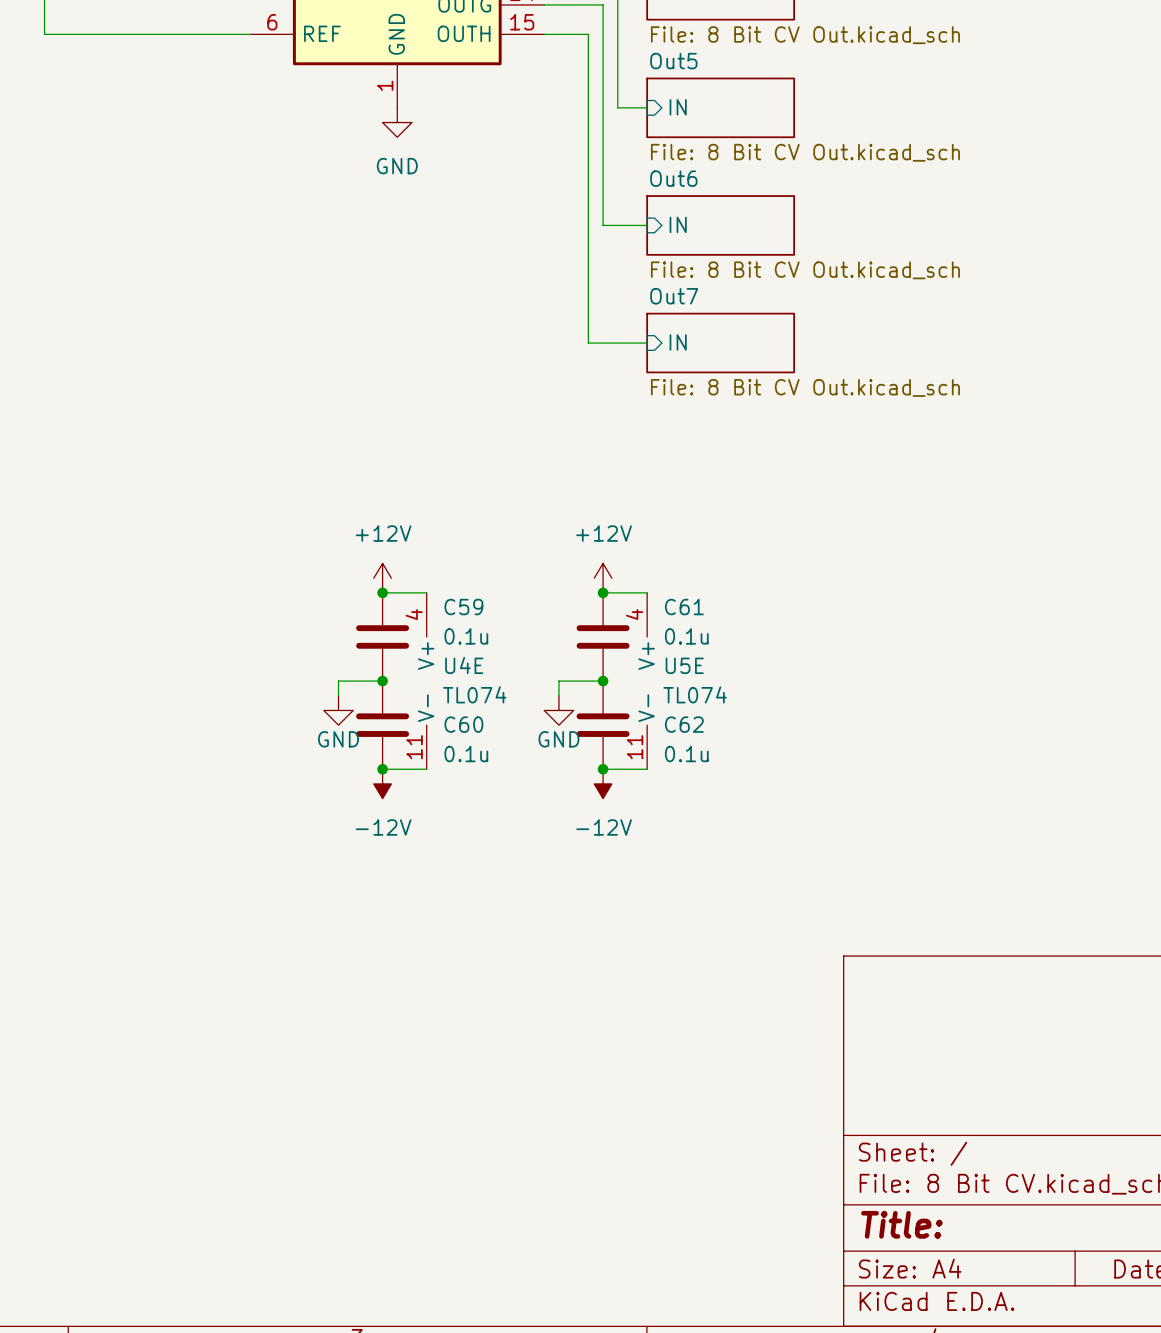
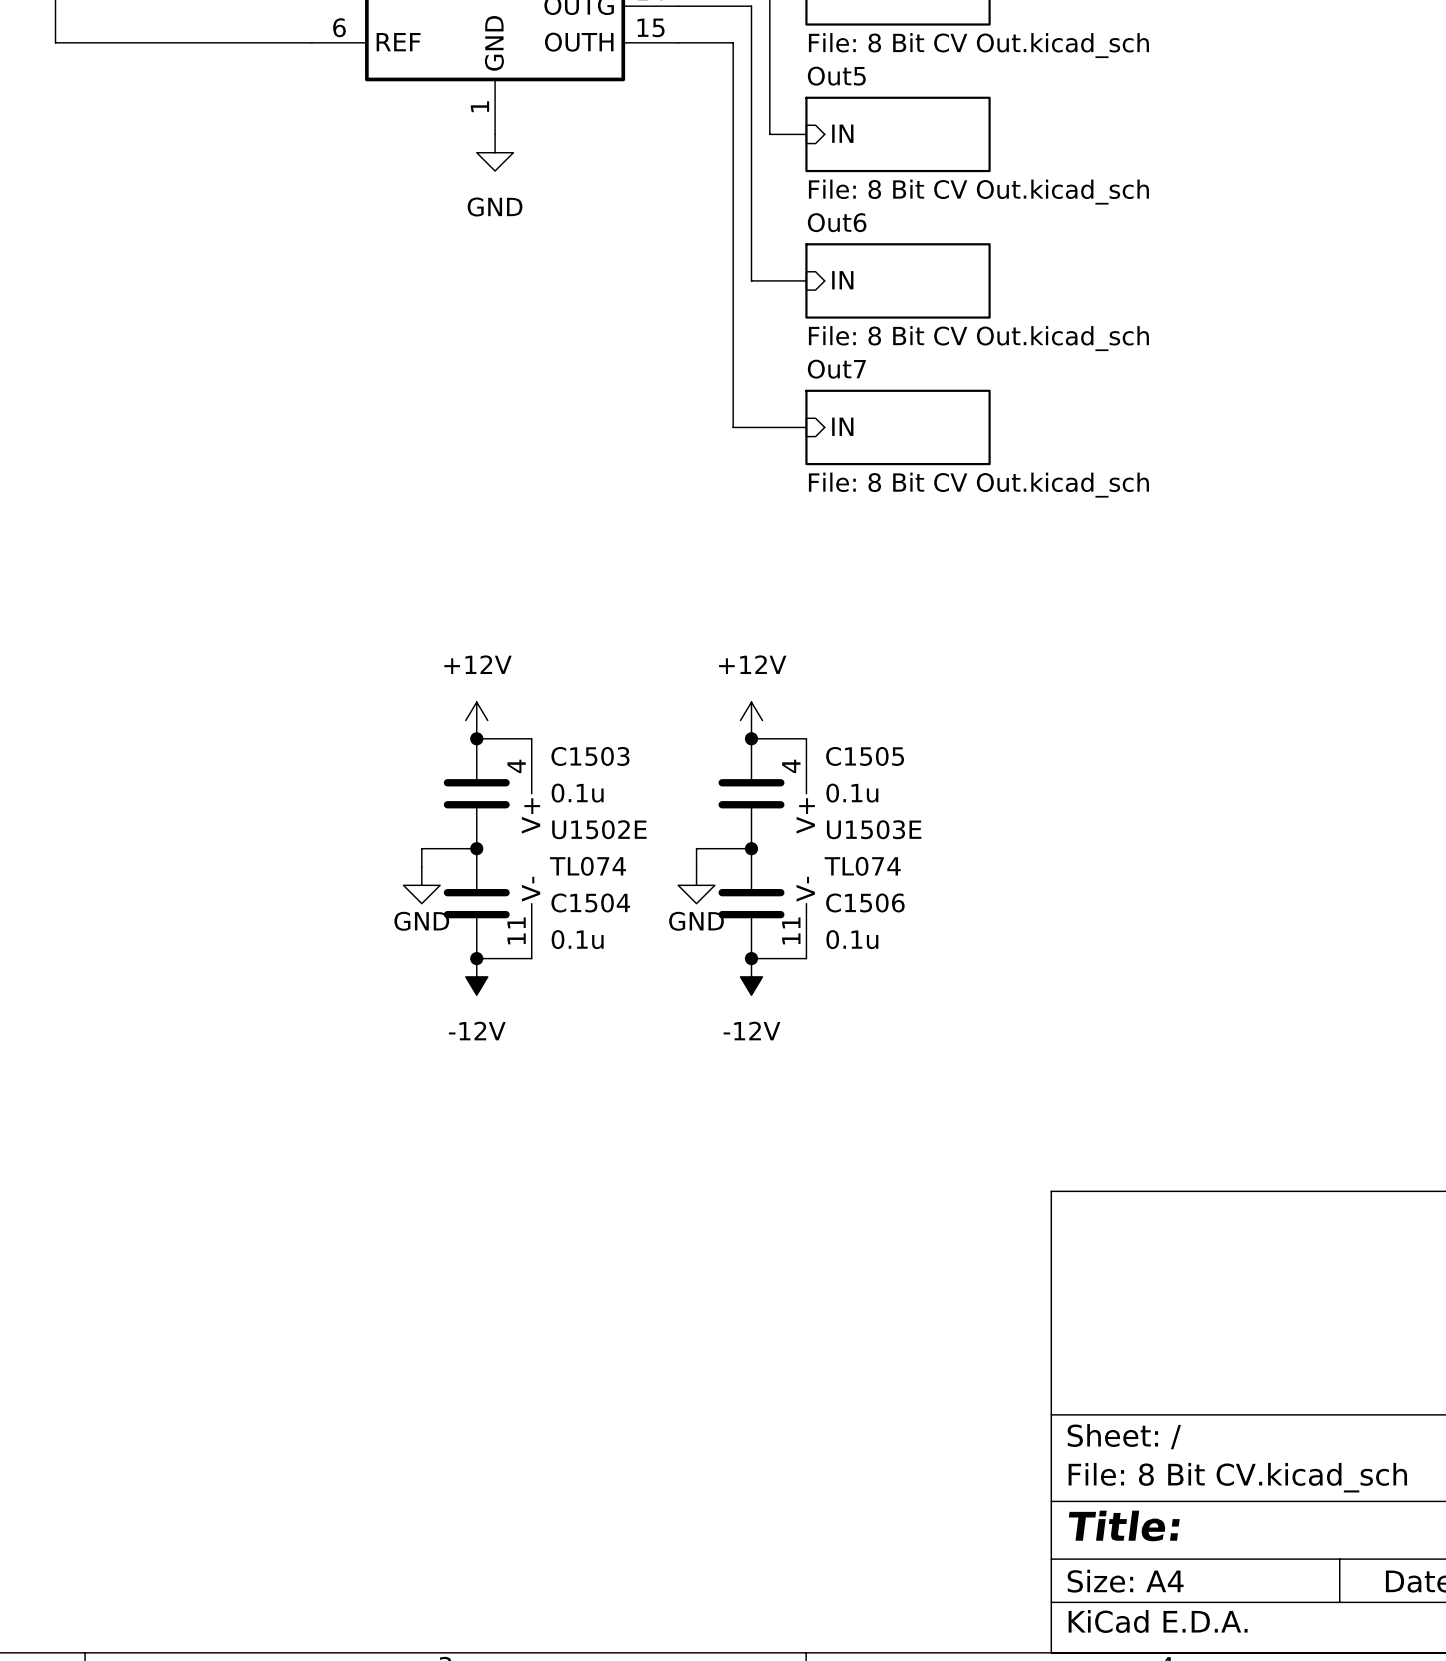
C59 name: C59 (463, 607) -> C1503 (590, 756)
C61 name: C61 (684, 607) -> C1505 (865, 756)
U4E name: U4E (464, 665) -> U1502E (599, 829)
U5E name: U5E (684, 665) -> U1503E (874, 829)
C60 name: C60 (463, 724) -> C1504 (590, 902)
C62 name: C62 (684, 724) -> C1506 (865, 902)

